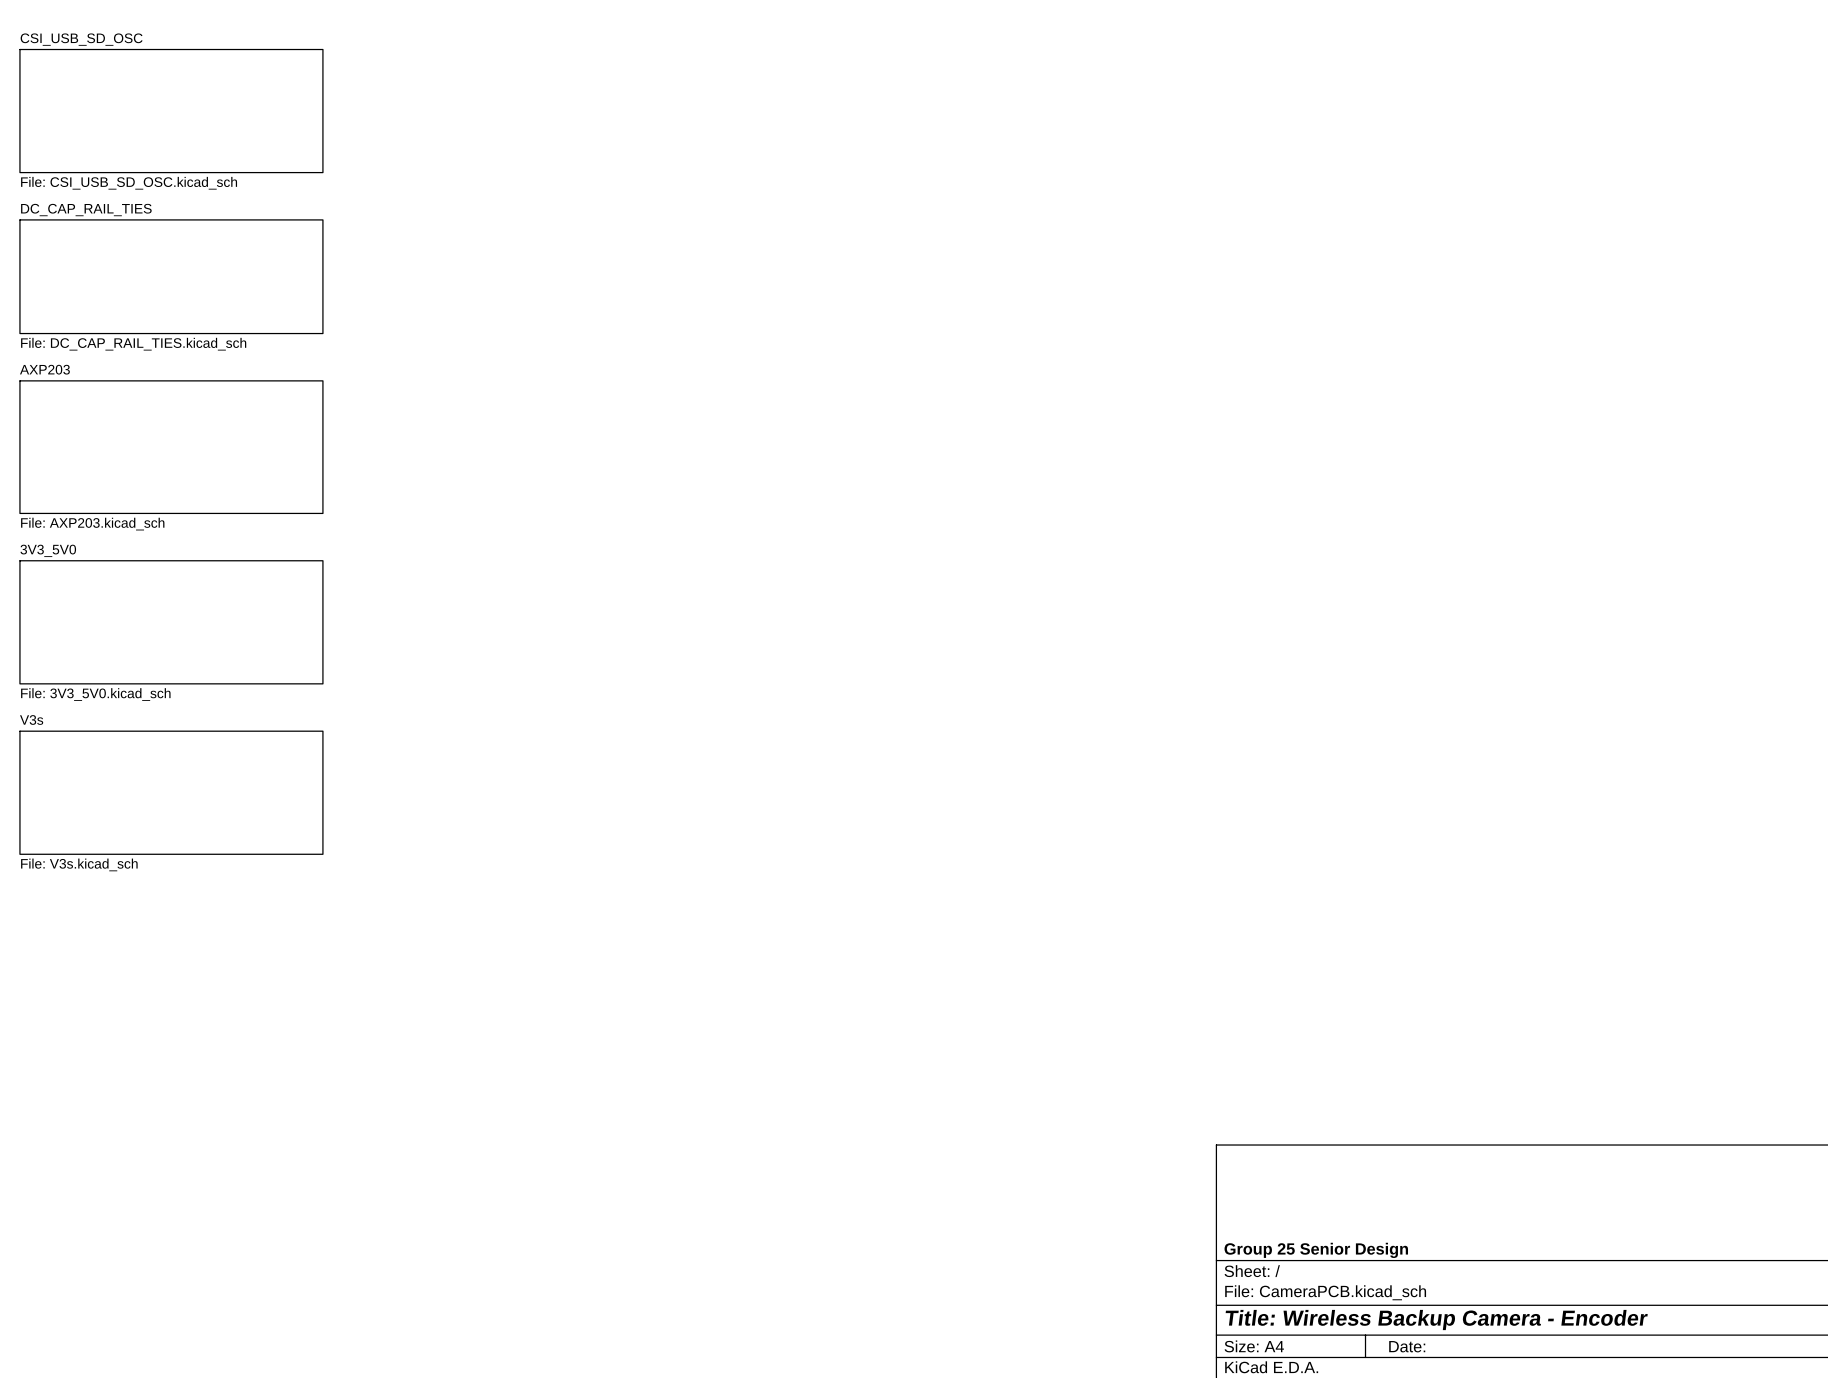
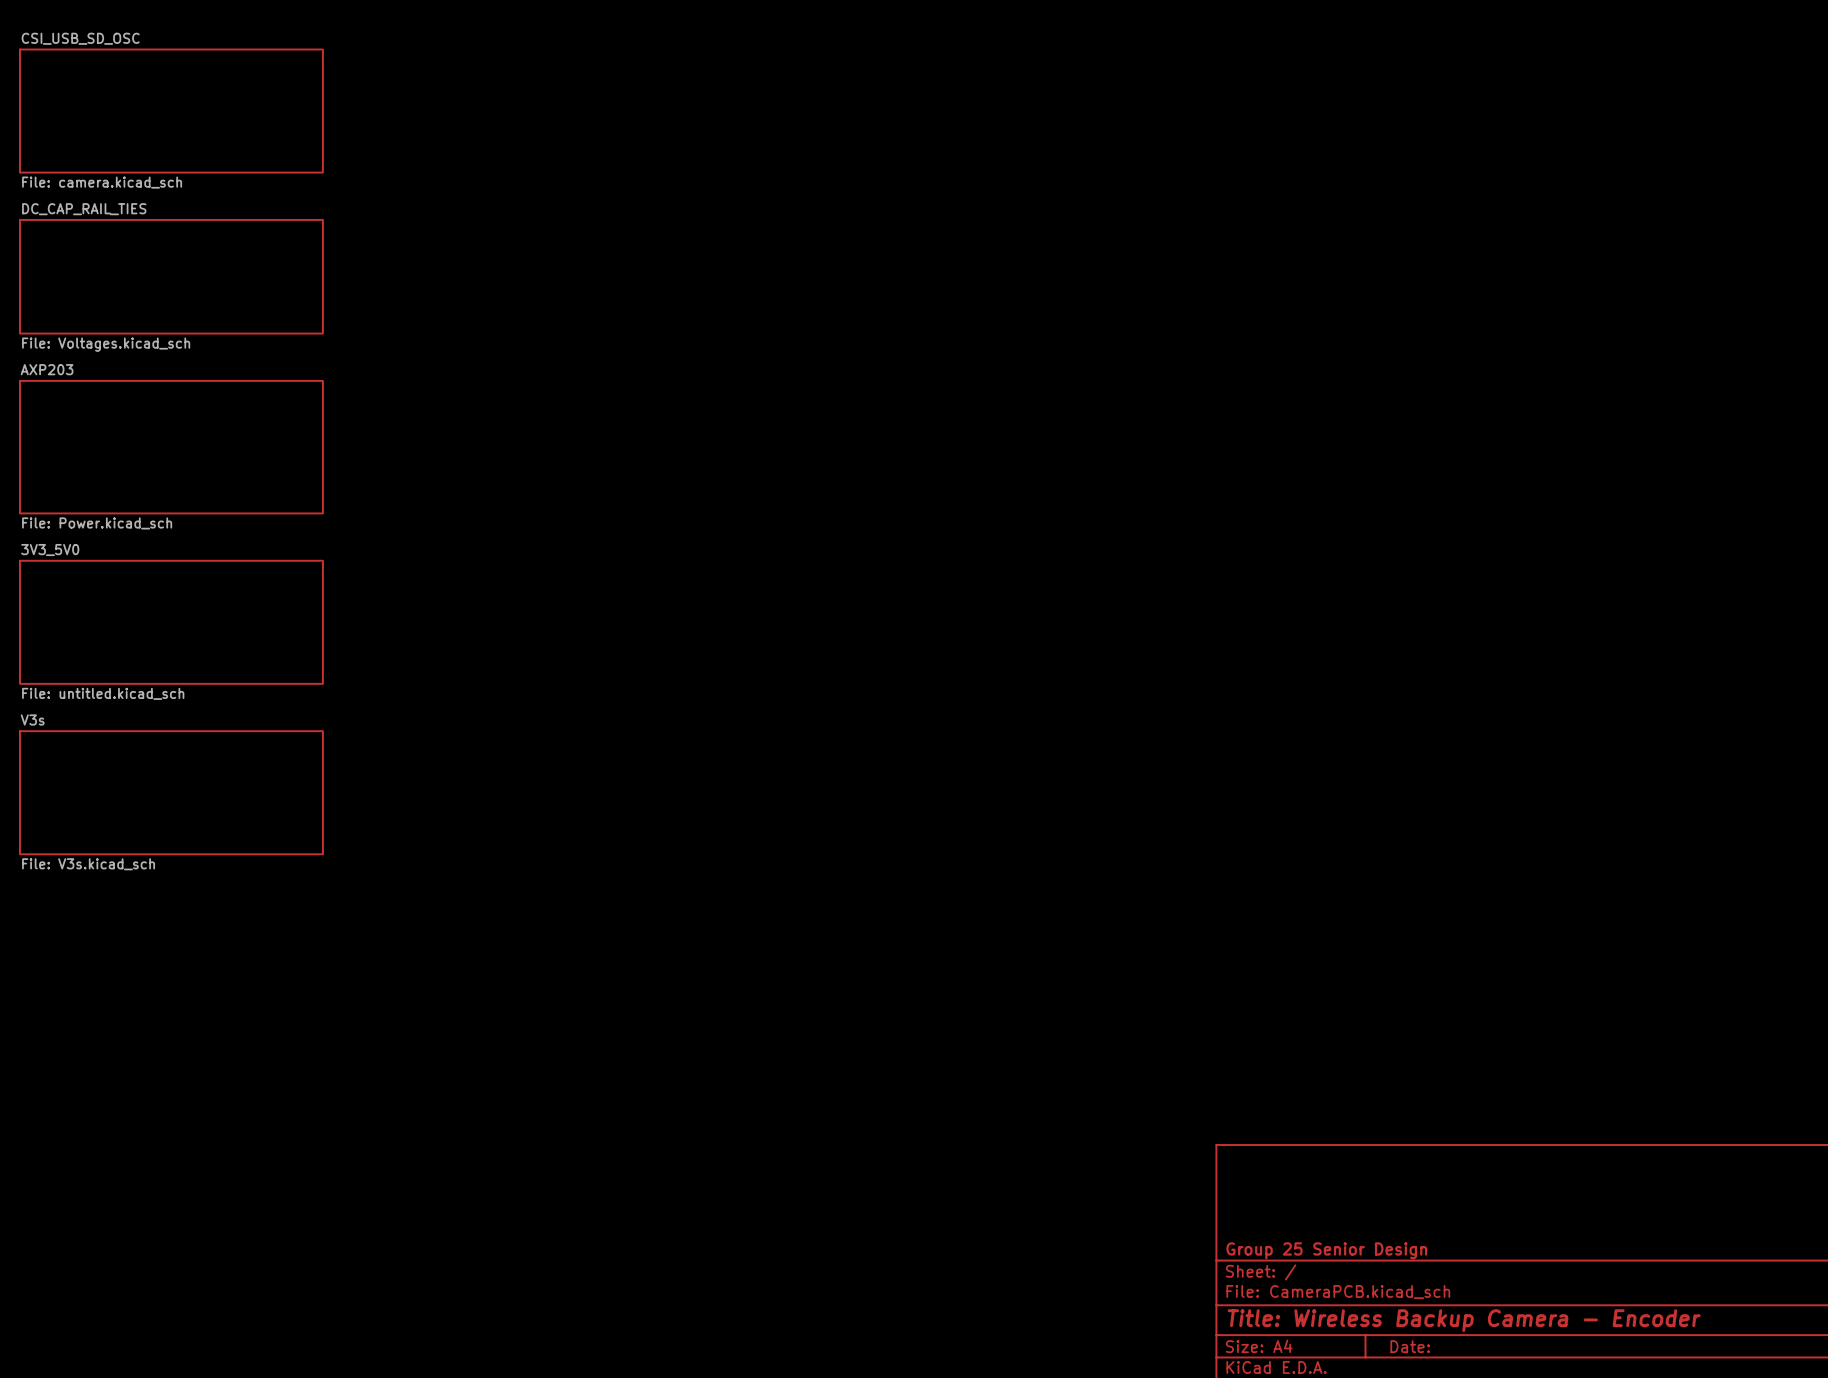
sheet CSI_USB_SD_OSC value: File: CSI_USB_SD_OSC.kicad_sch (129, 183) -> File: camera.kicad_sch (102, 182)
sheet DC_CAP_RAIL_TIES value: File: DC_CAP_RAIL_TIES.kicad_sch (133, 344) -> File: Voltages.kicad_sch (106, 344)
sheet AXP203 value: File: AXP203.kicad_sch (92, 524) -> File: Power.kicad_sch (97, 523)
sheet 3V3_5V0 value: File: 3V3_5V0.kicad_sch (95, 694) -> File: untitled.kicad_sch (103, 693)

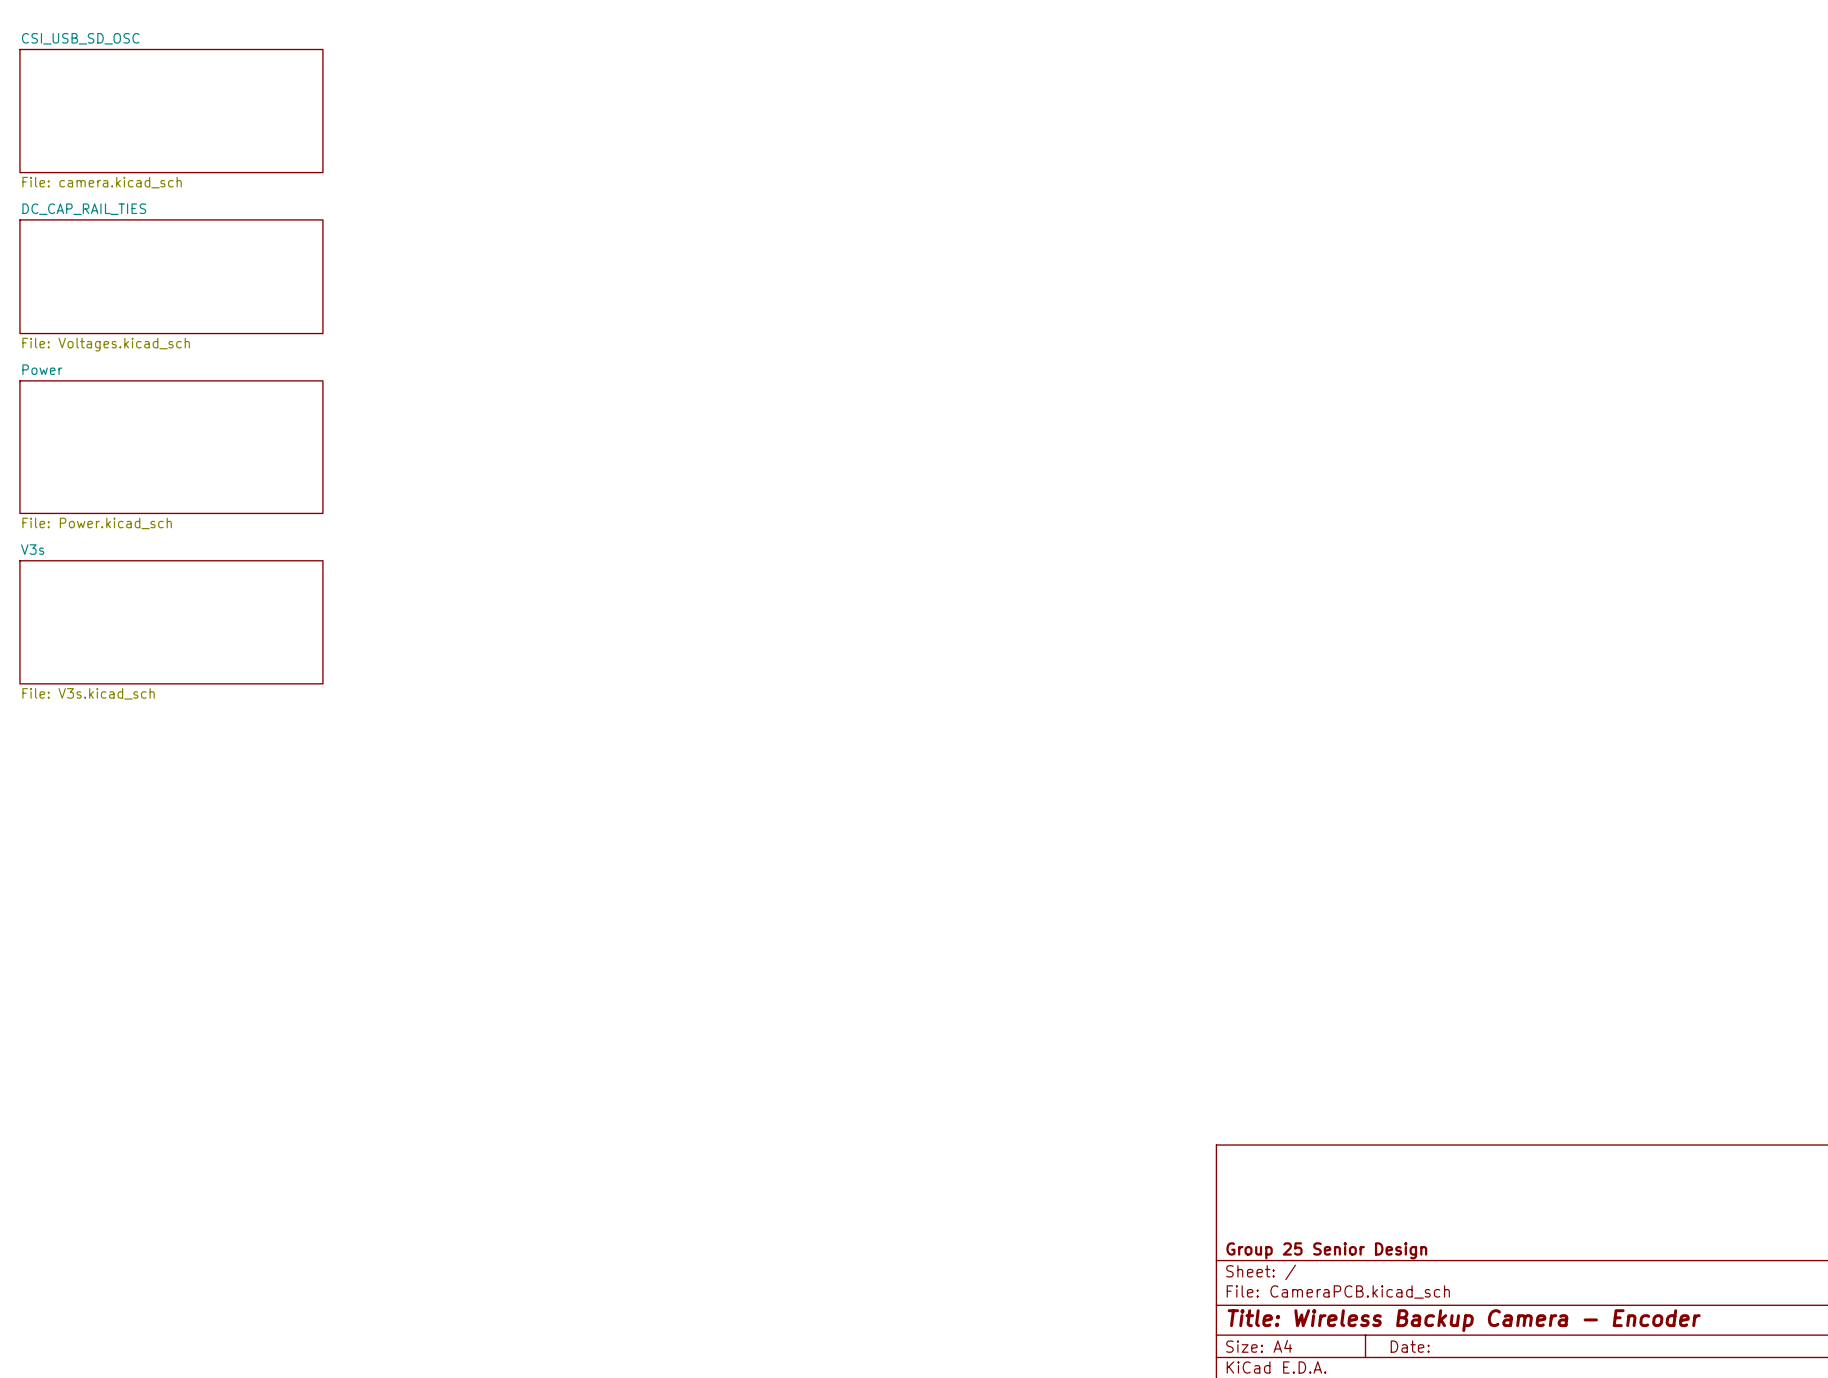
sheet AXP203 name: AXP203 (47, 369) -> Power (42, 369)
sheet 3V3_5V0 name: 3V3_5V0 (50, 550) -> V3s (32, 549)
sheet 3V3_5V0 value: File: untitled.kicad_sch (103, 693) -> File: V3s.kicad_sch (88, 693)
sheet V3s: File: V3s.kicad_sch (171, 792) -> none

